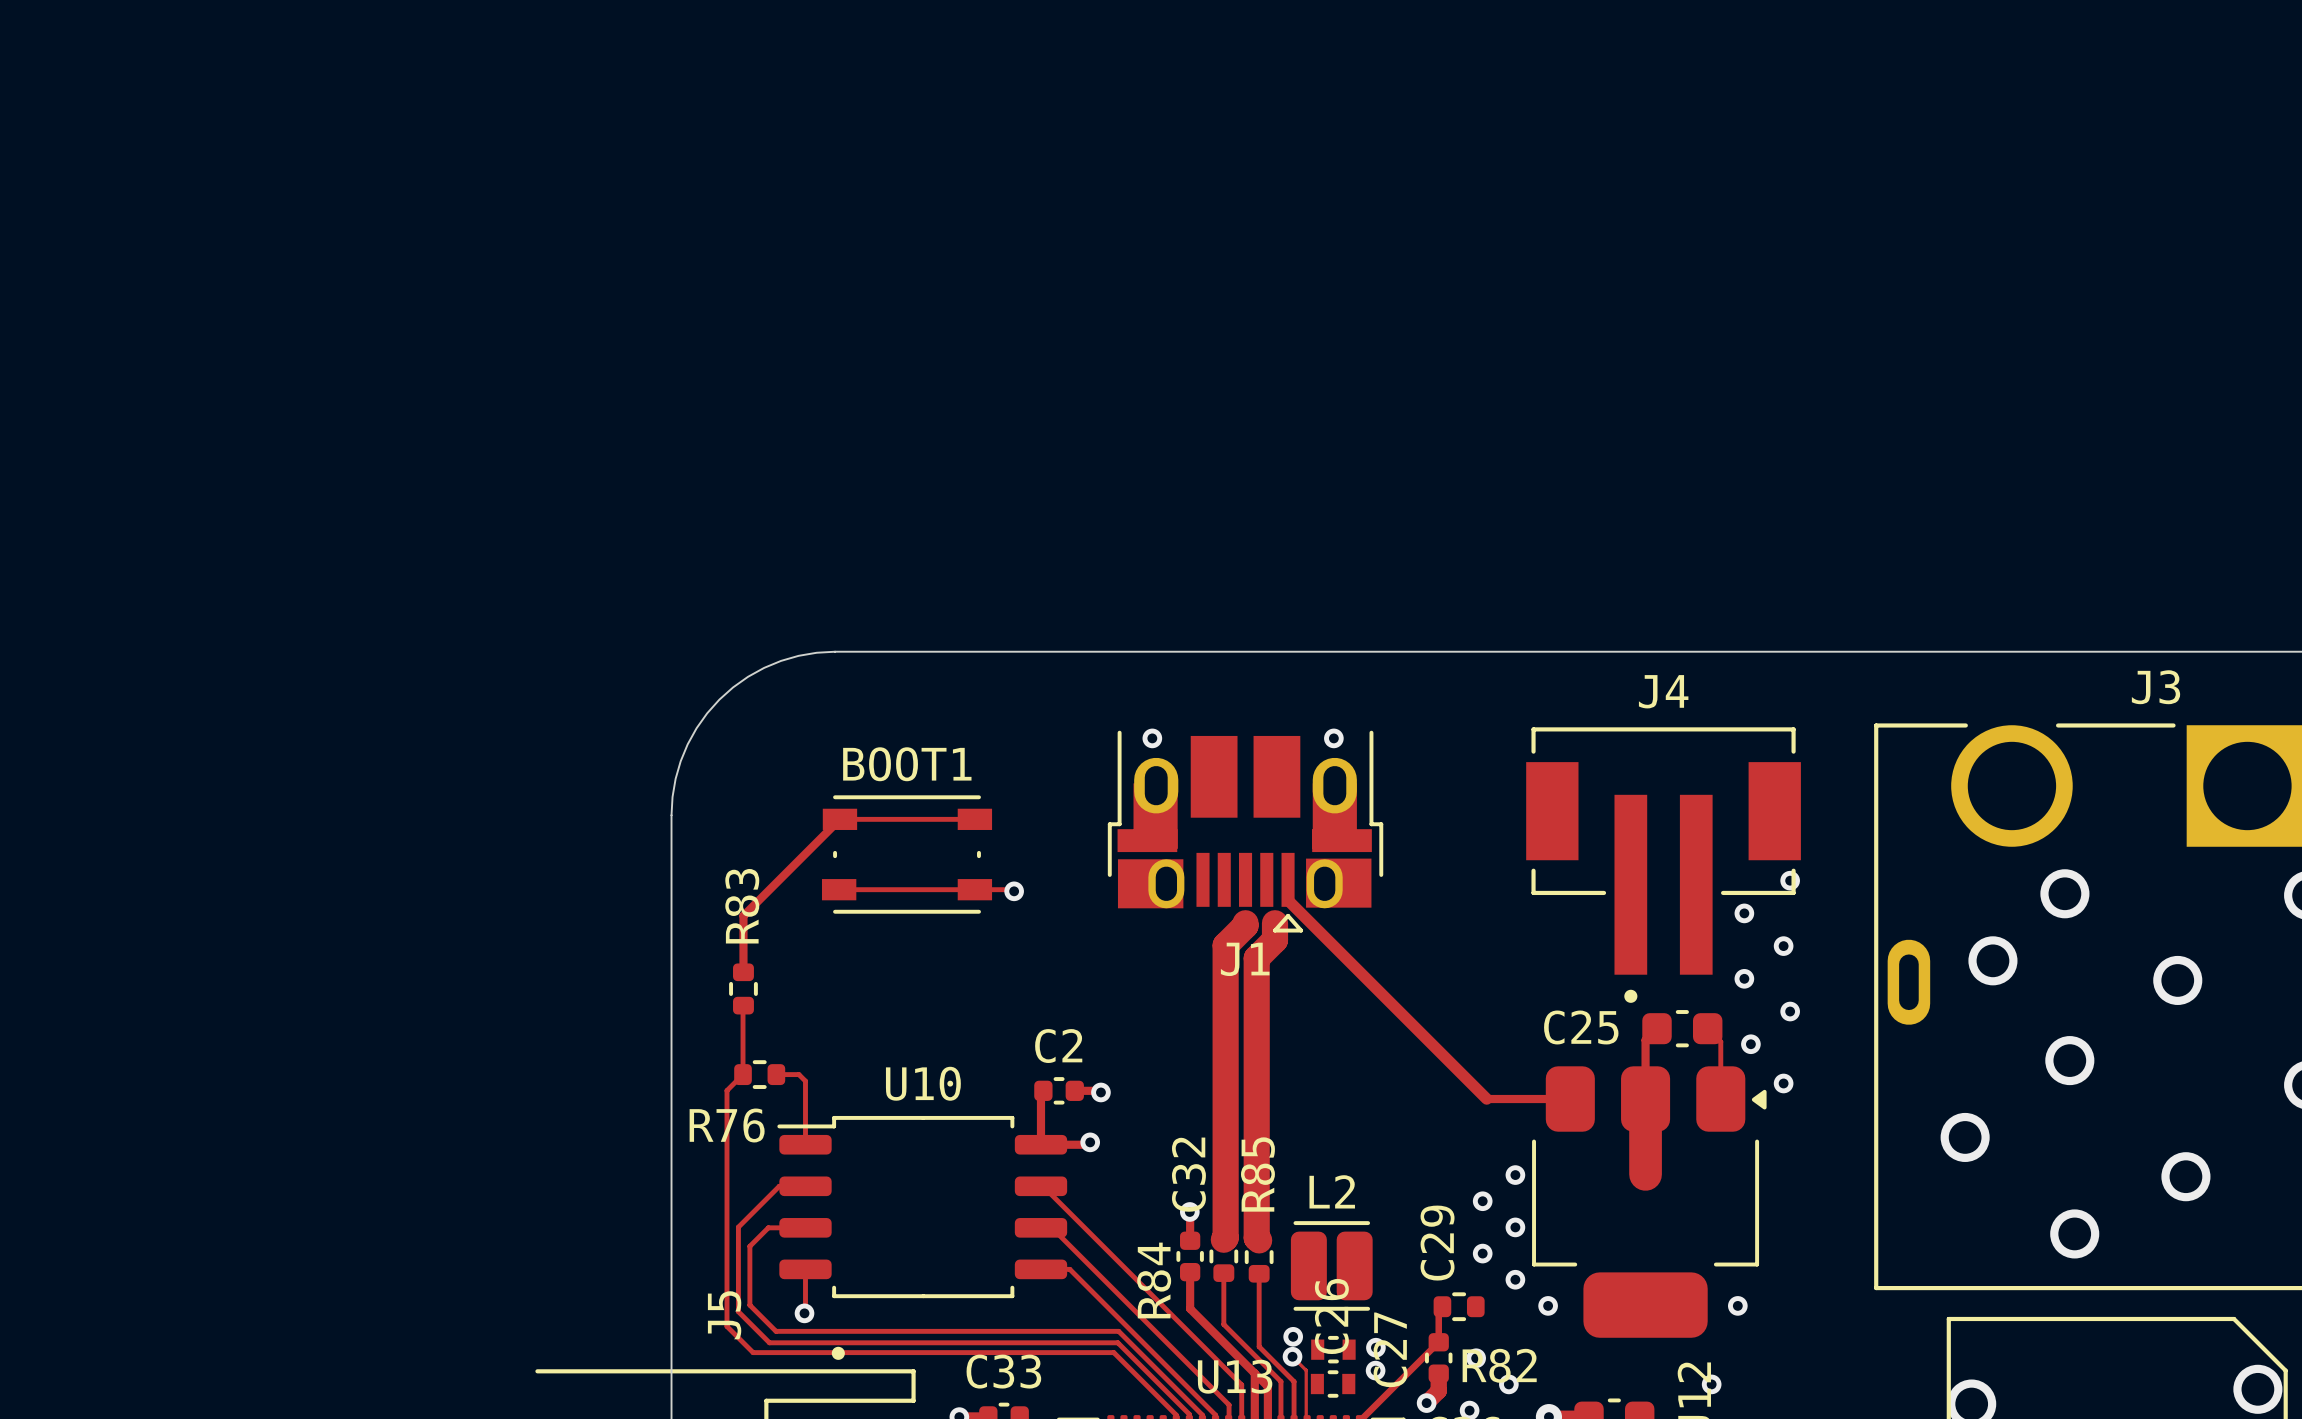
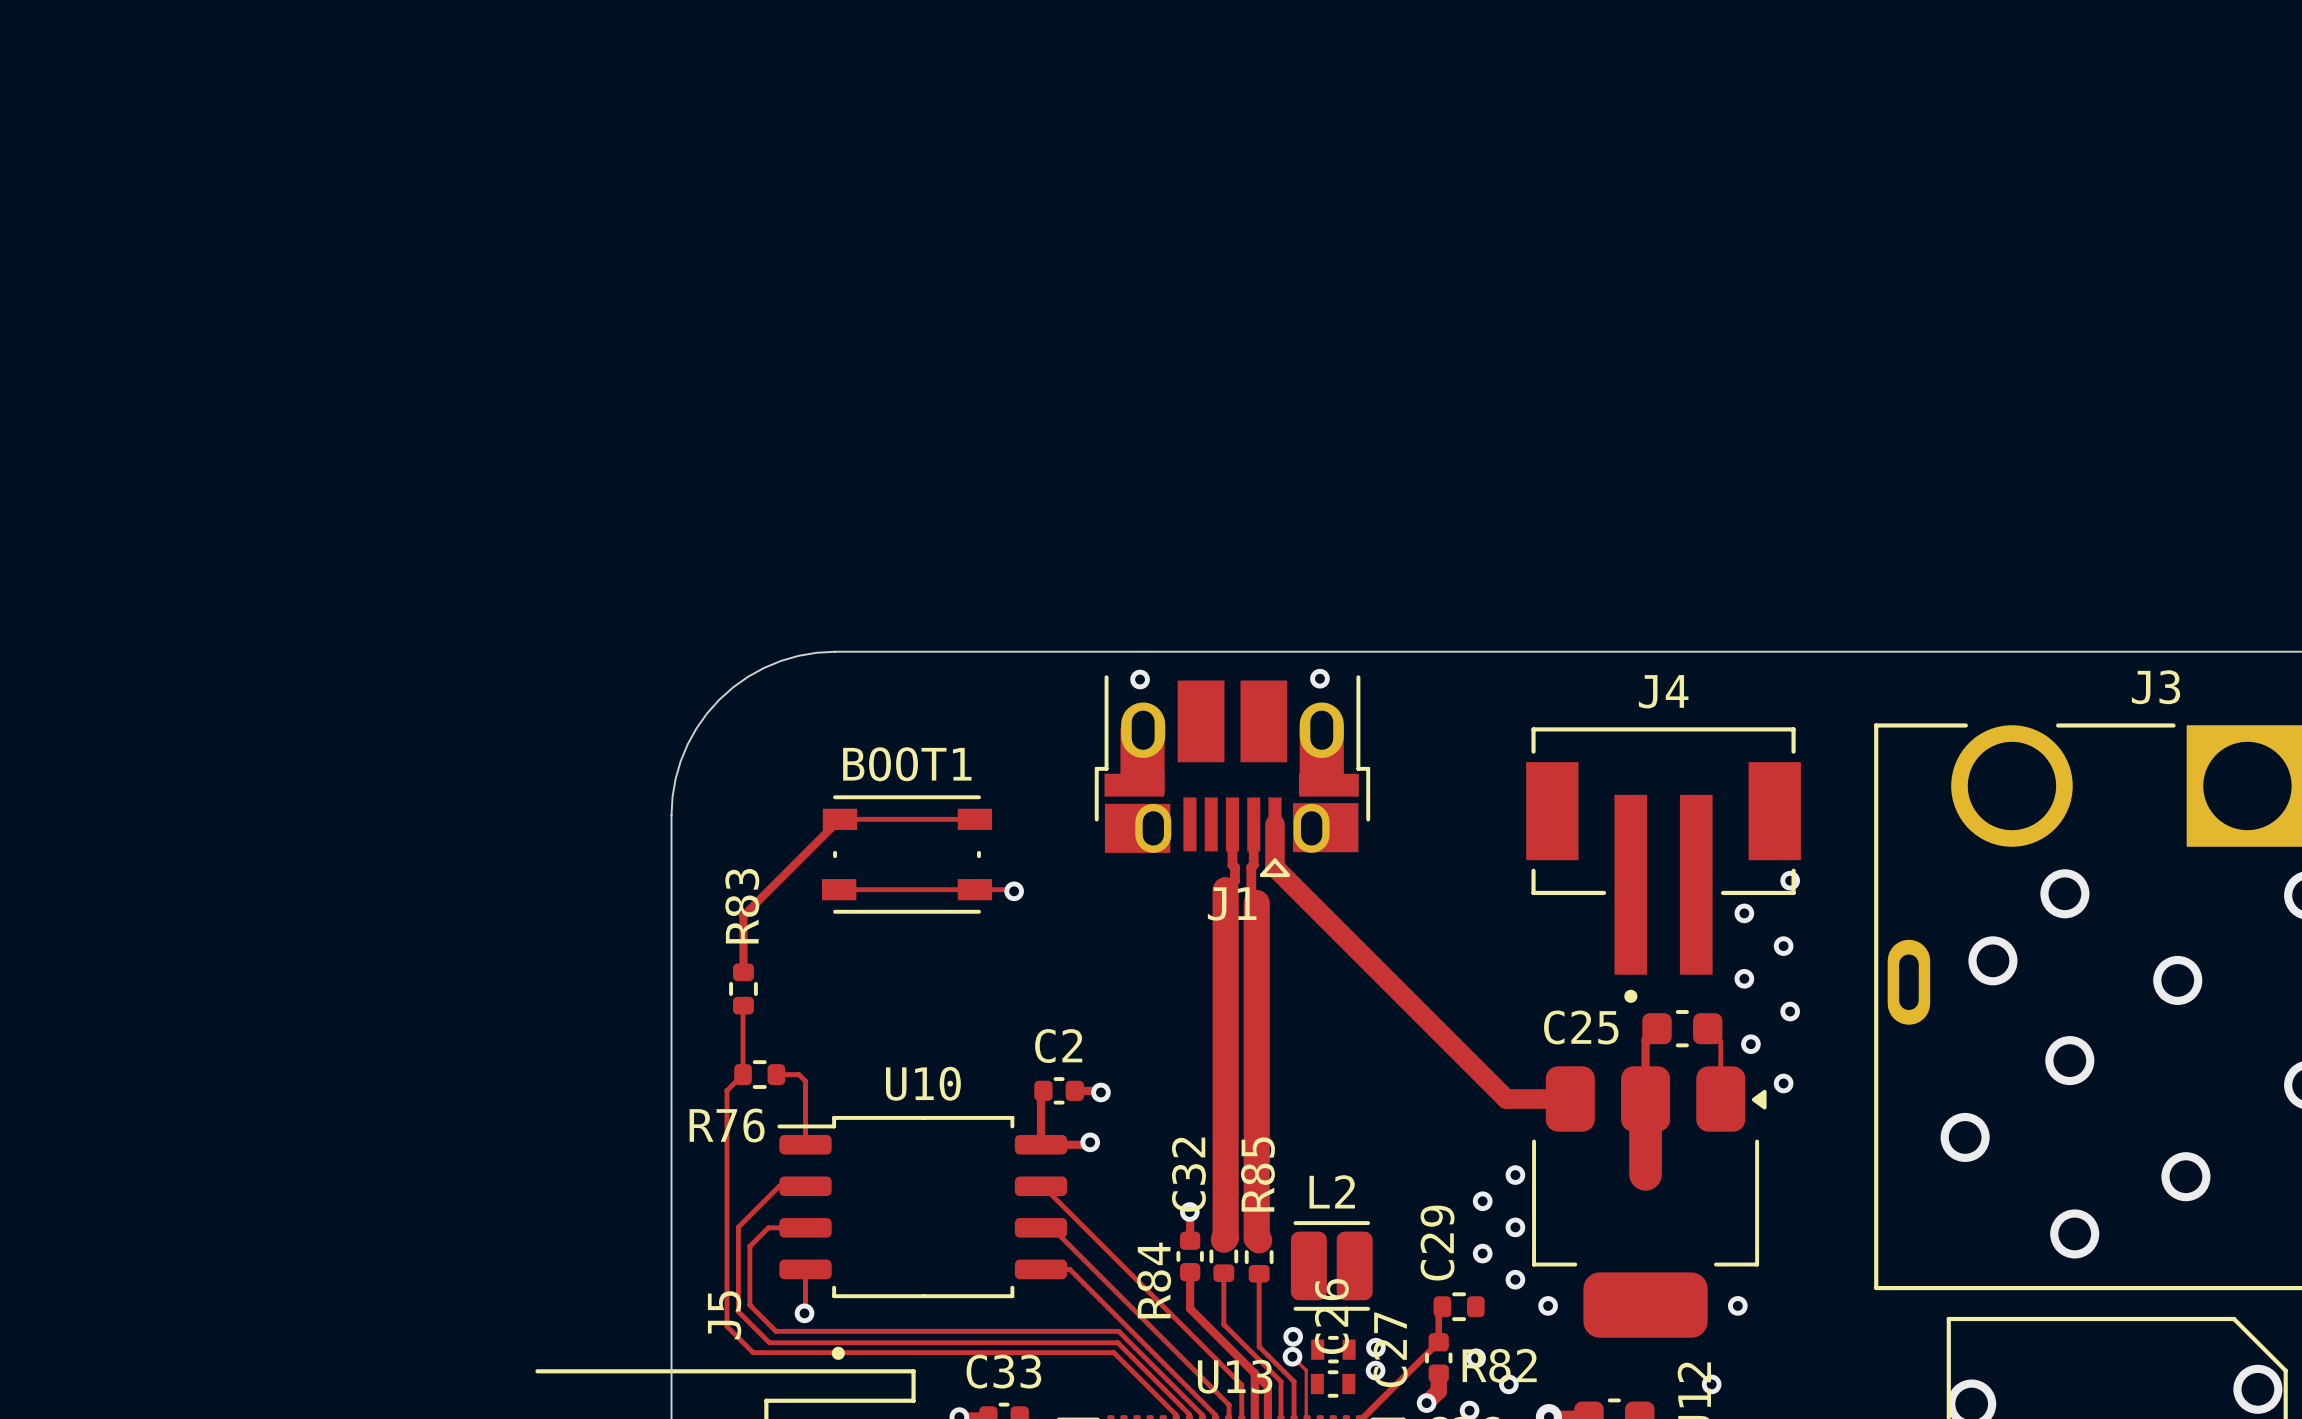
via position: (1152, 738) -> (1140, 679)
via position: (1333, 738) -> (1319, 678)
J1 position: (1245, 831) -> (1232, 776)
track: (1288, 879) (1288, 900) (1486, 1099) (1506, 1099) -> (1274, 824) (1274, 867) (1506, 1099)
track: (1245, 923) (1245, 925) (1225, 945) -> (1232, 824) (1232, 864) (1234, 867) (1234, 880) (1225, 890) (1225, 945)
track: (1275, 923) (1275, 940) (1256, 958) -> (1253, 824) (1251, 897) (1256, 902) (1256, 958)
track width: thin (1506, 1099) (1570, 1099) -> thick (1506, 1099) (1570, 1099)

